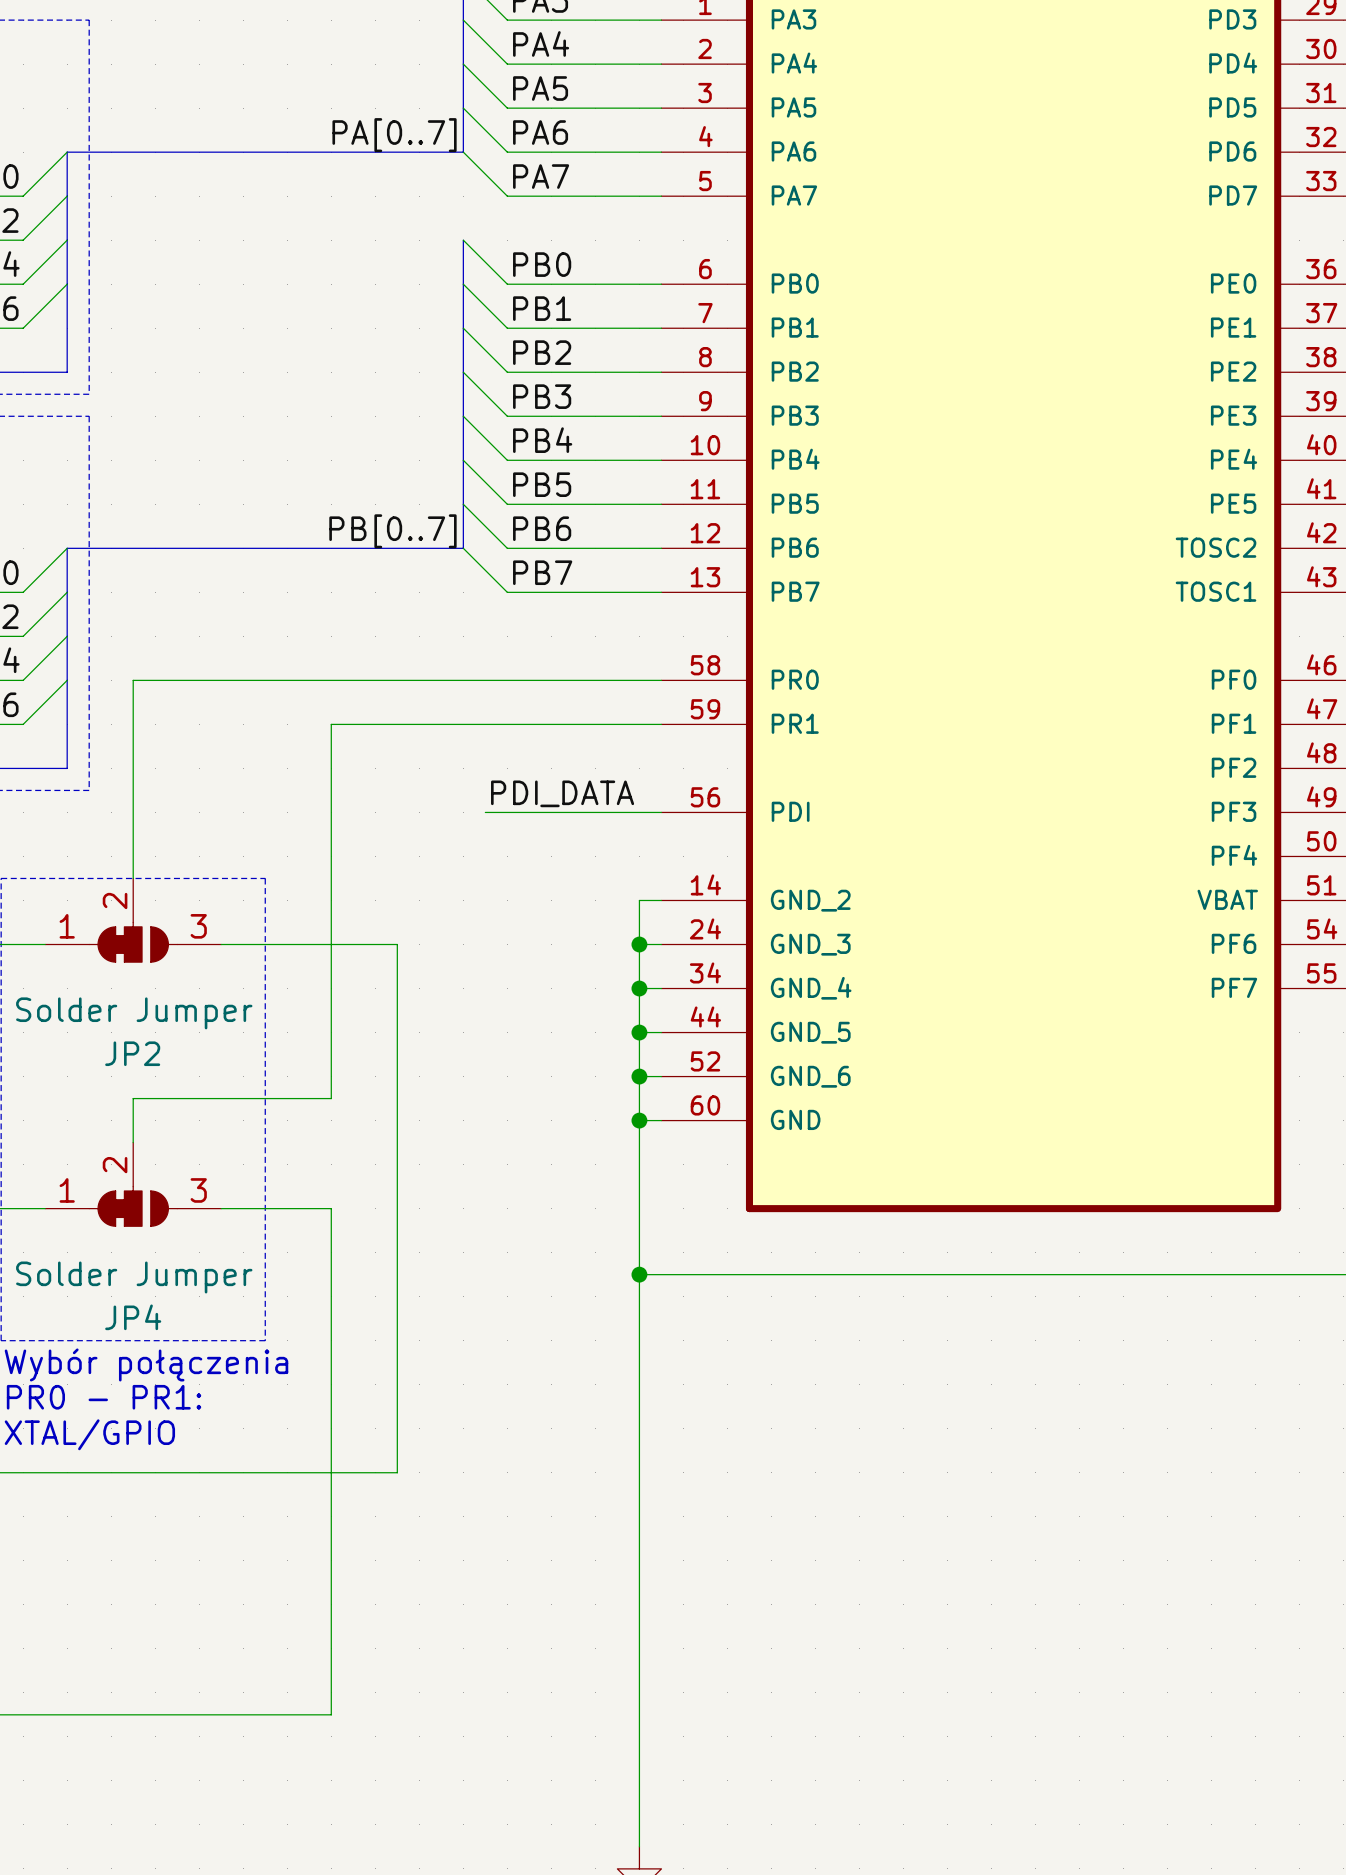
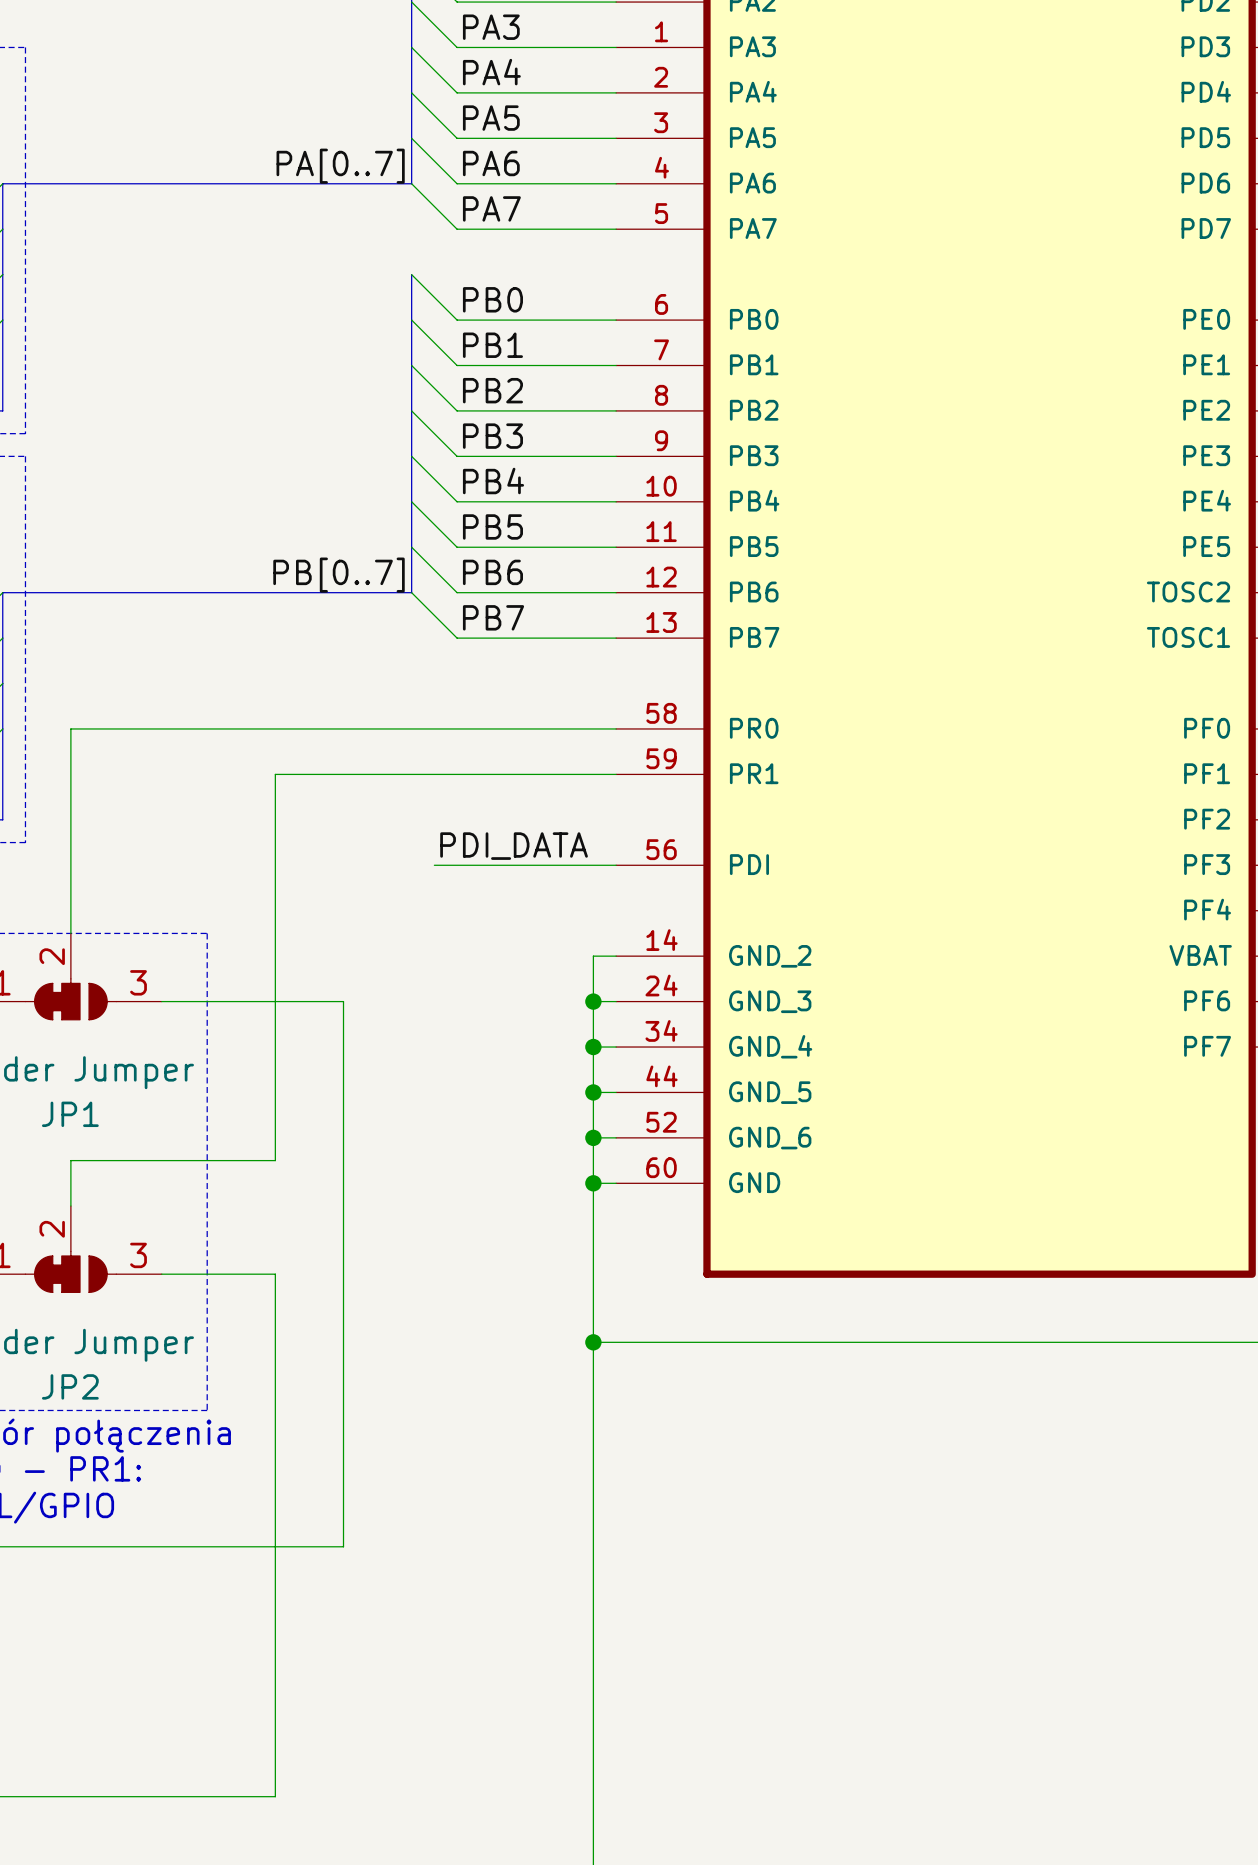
JP2 name: JP2 (132, 1053) -> JP1 (70, 1114)
JP4 name: JP4 (133, 1317) -> JP2 (70, 1386)

